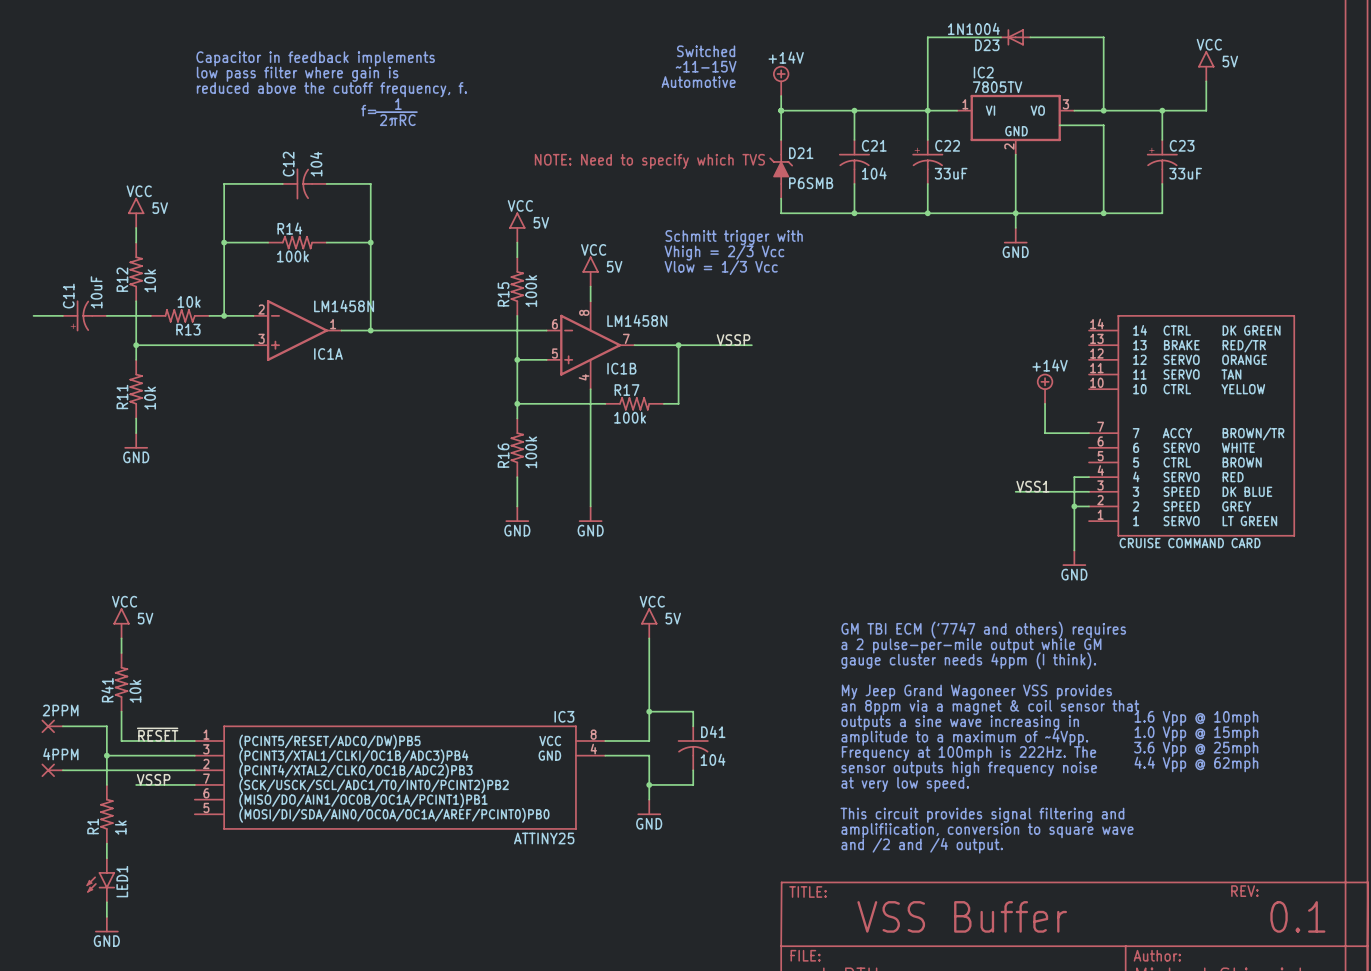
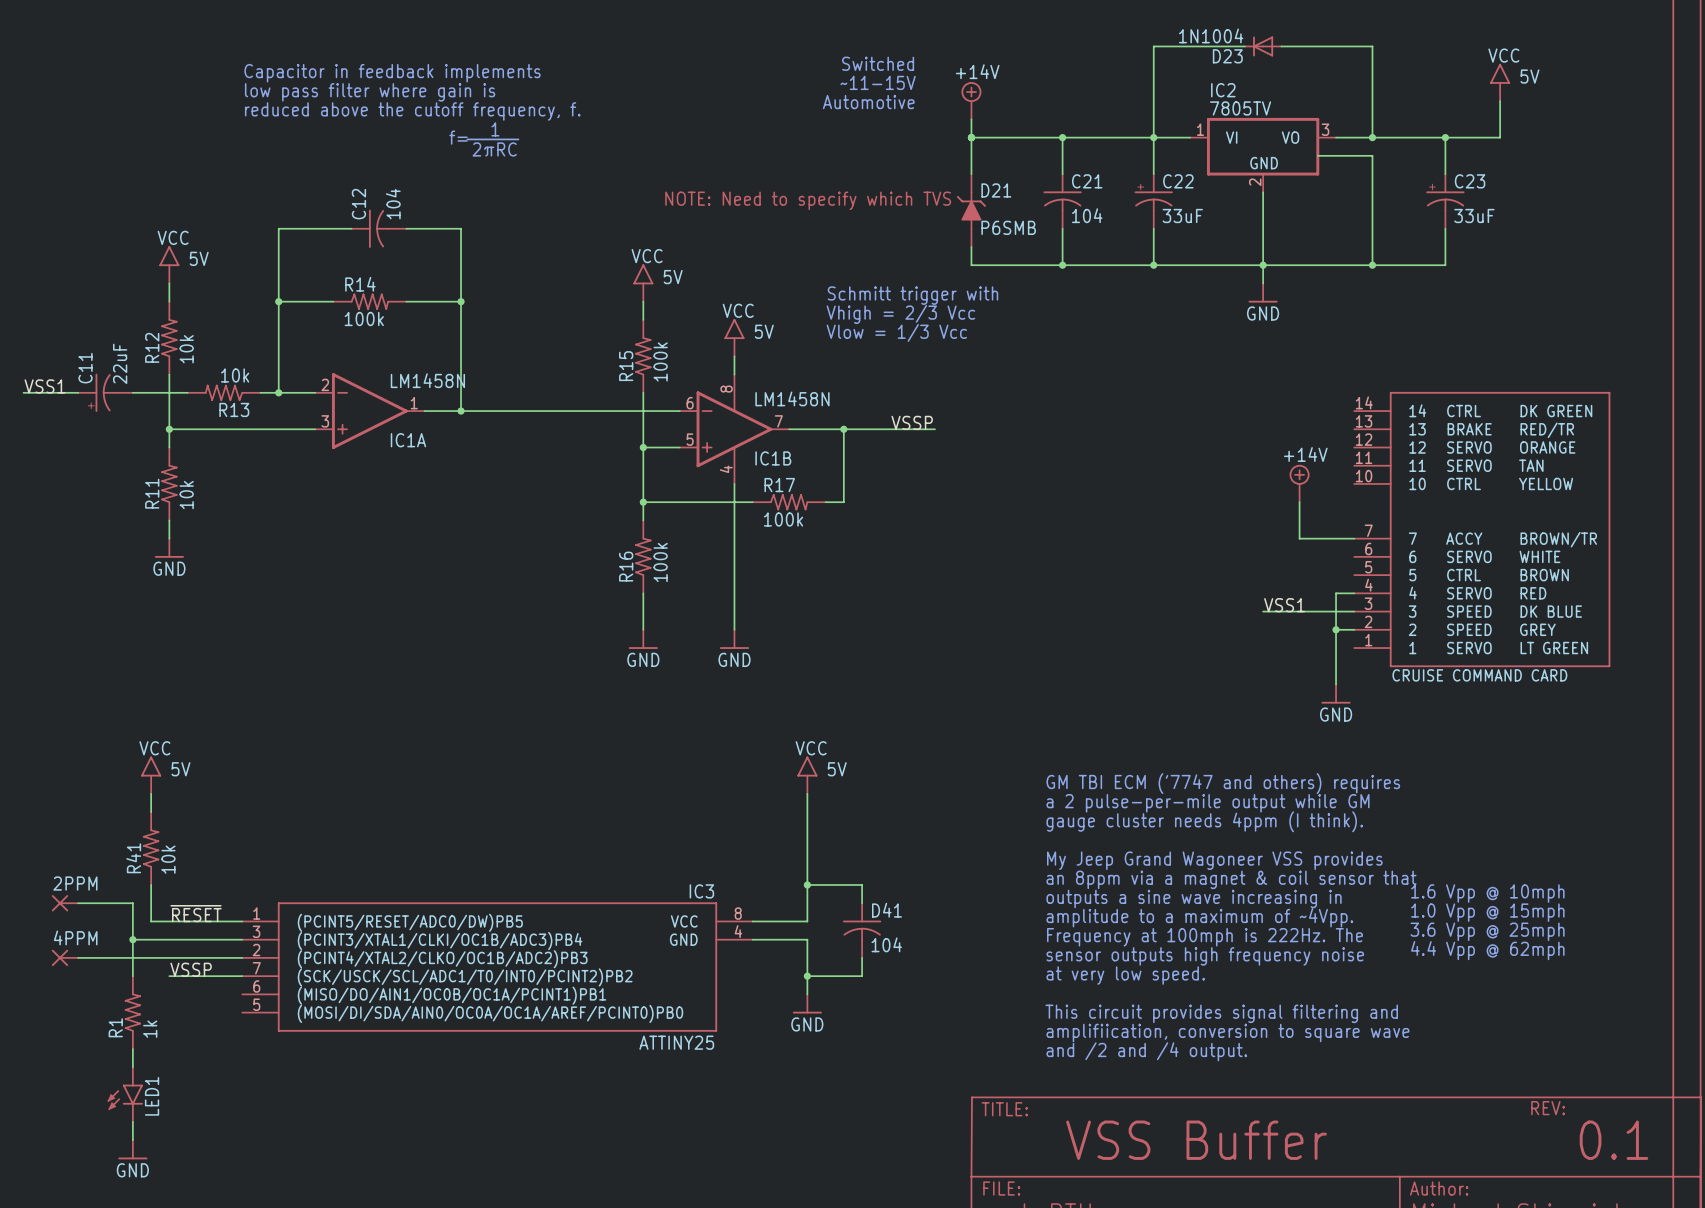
C11 value: 10uF (96, 292) -> 22uF (120, 363)
label: none -> VSS1 (44, 386)
wire: none -> (23, 392) (41, 392)

